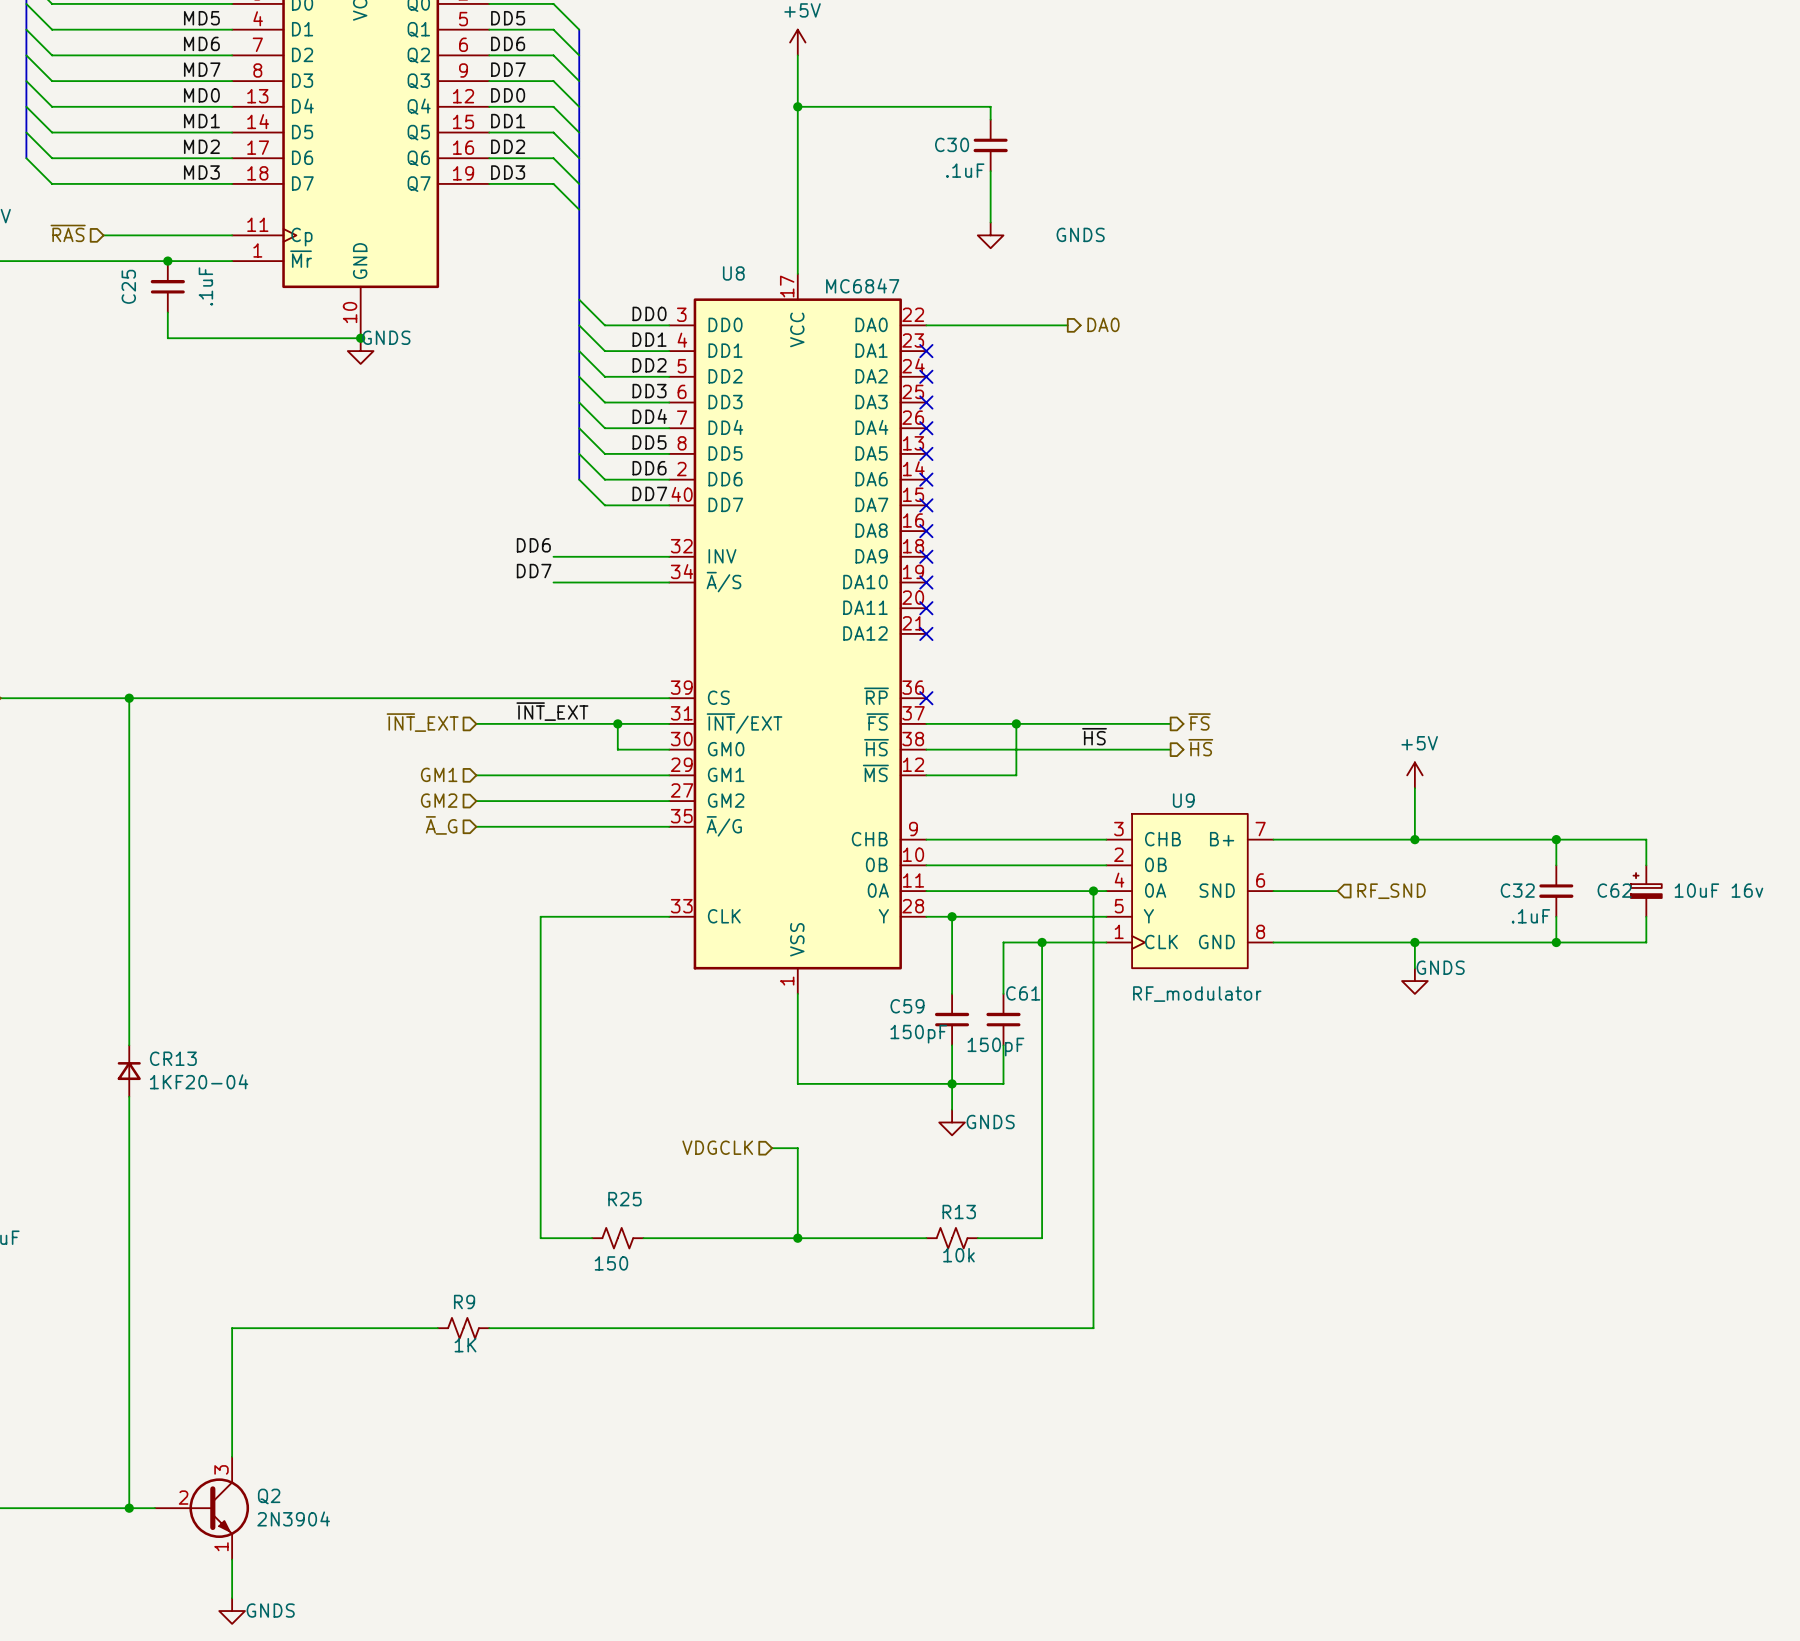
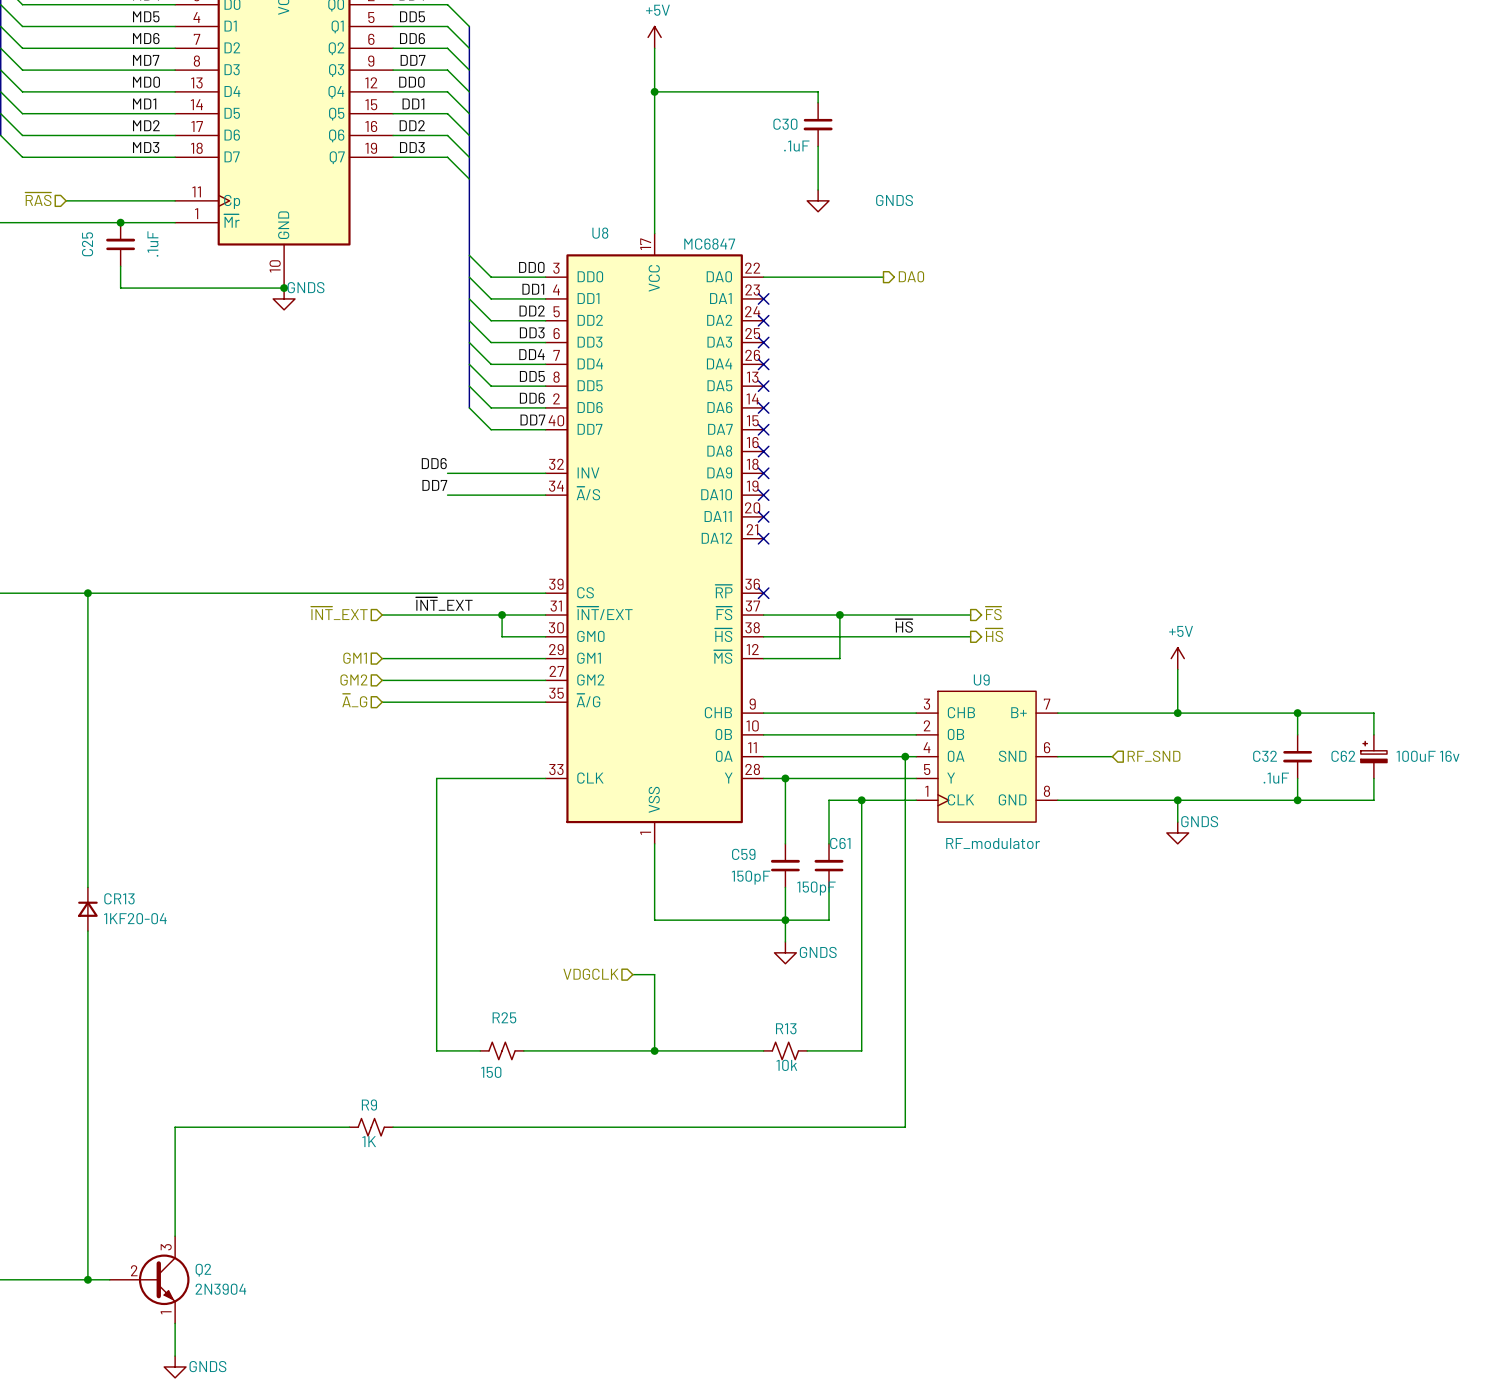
C62 value: 10uF 16v (1718, 890) -> 100uF 16v (1428, 756)

